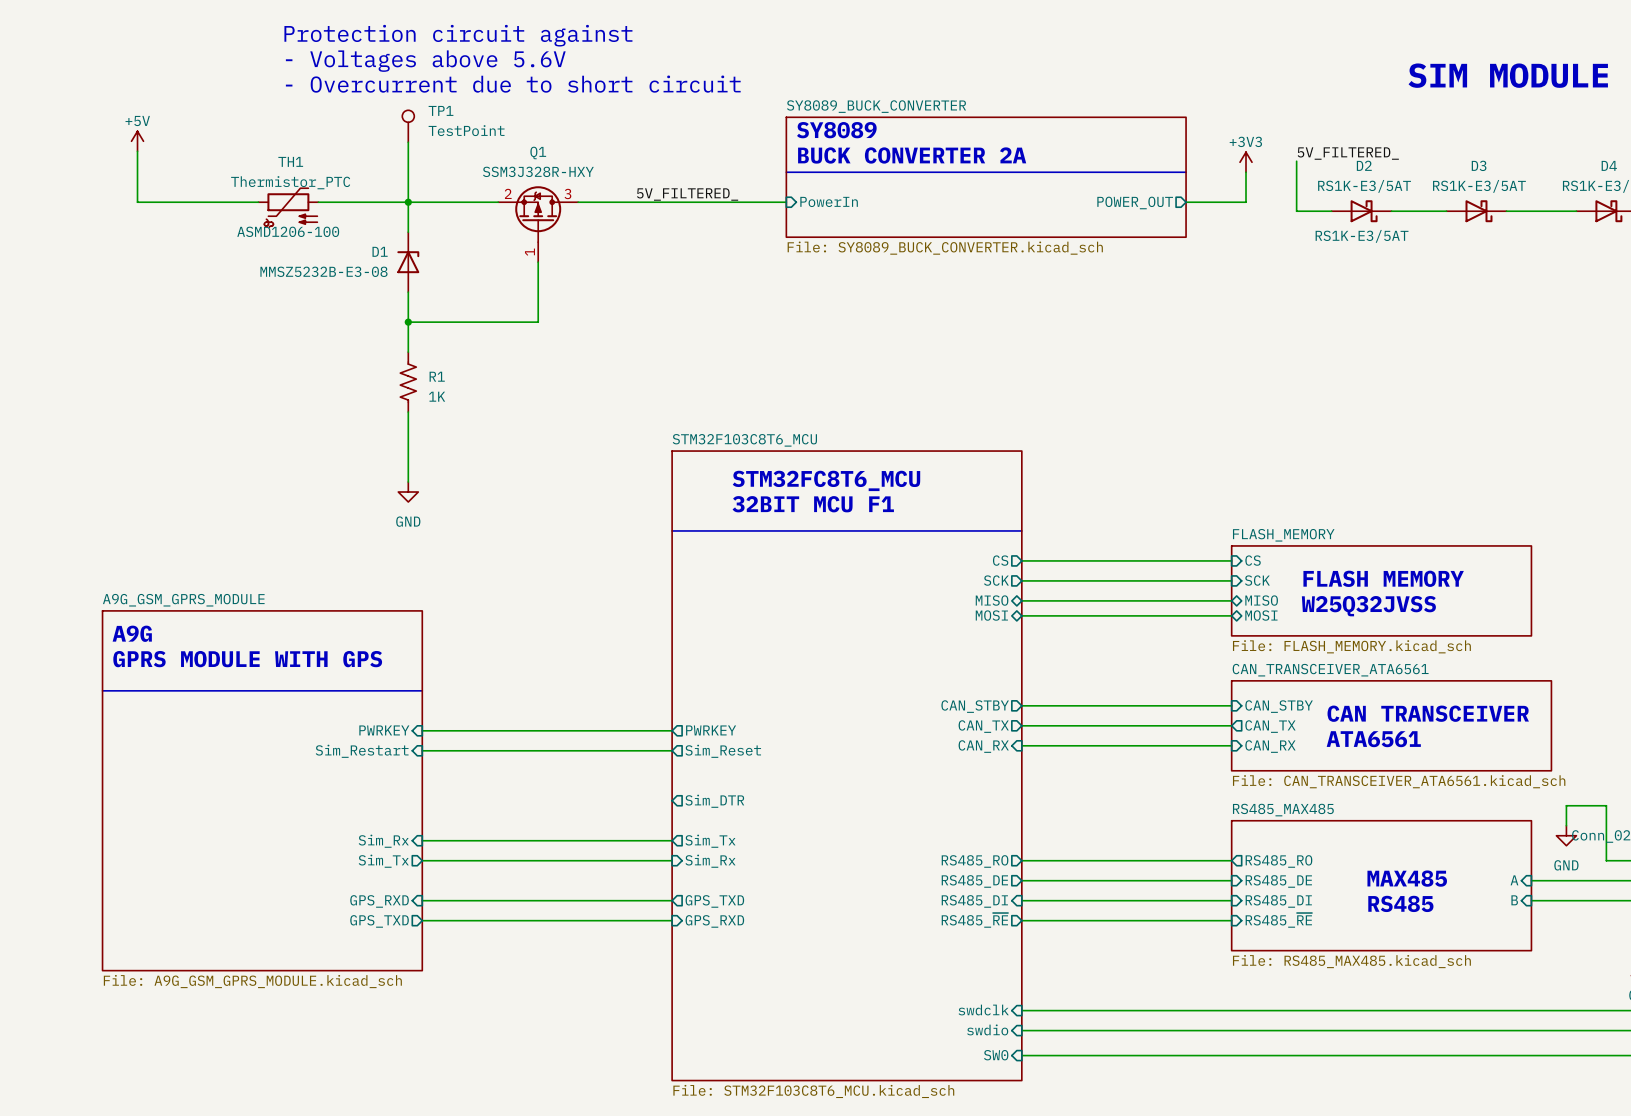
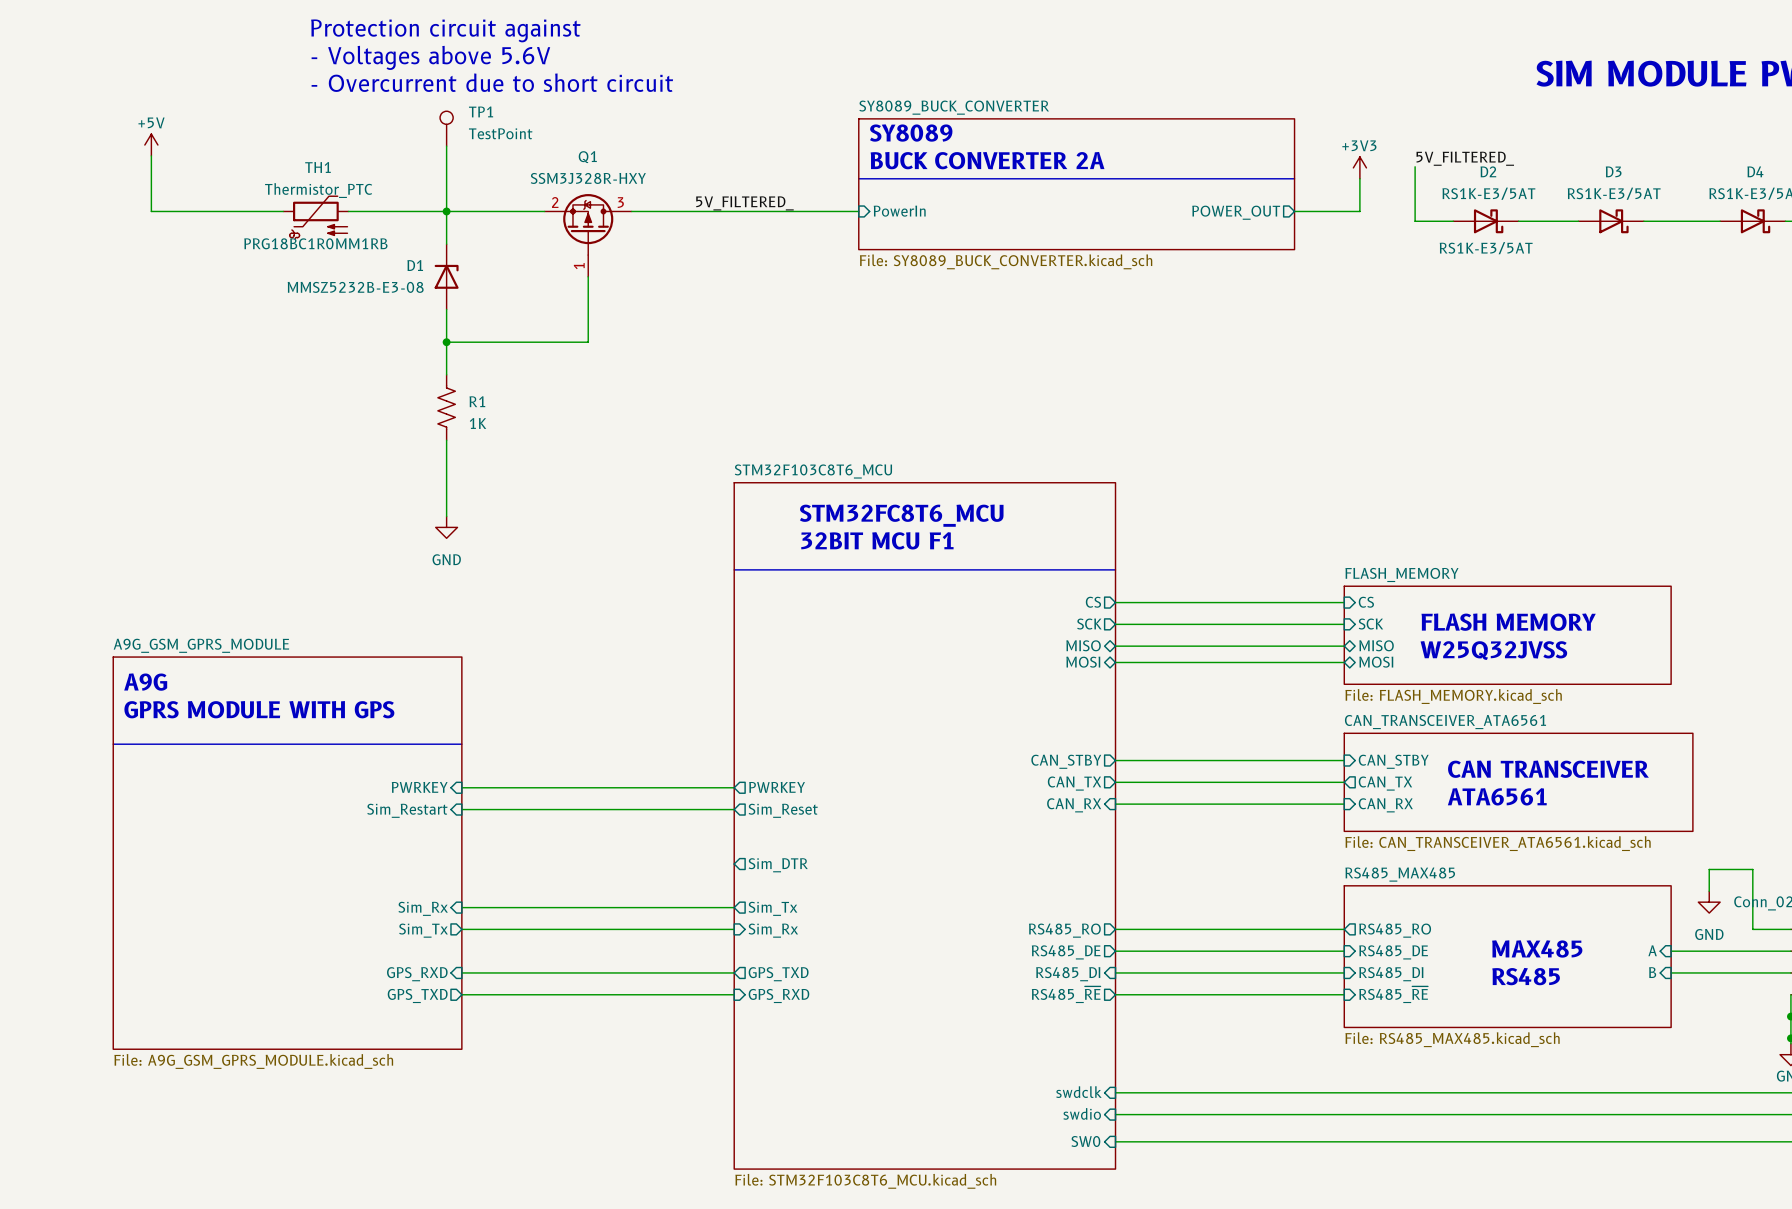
TH1 text: ASMD1206-100 (288, 231) -> PRG18BC1R0MM1RB (315, 243)

